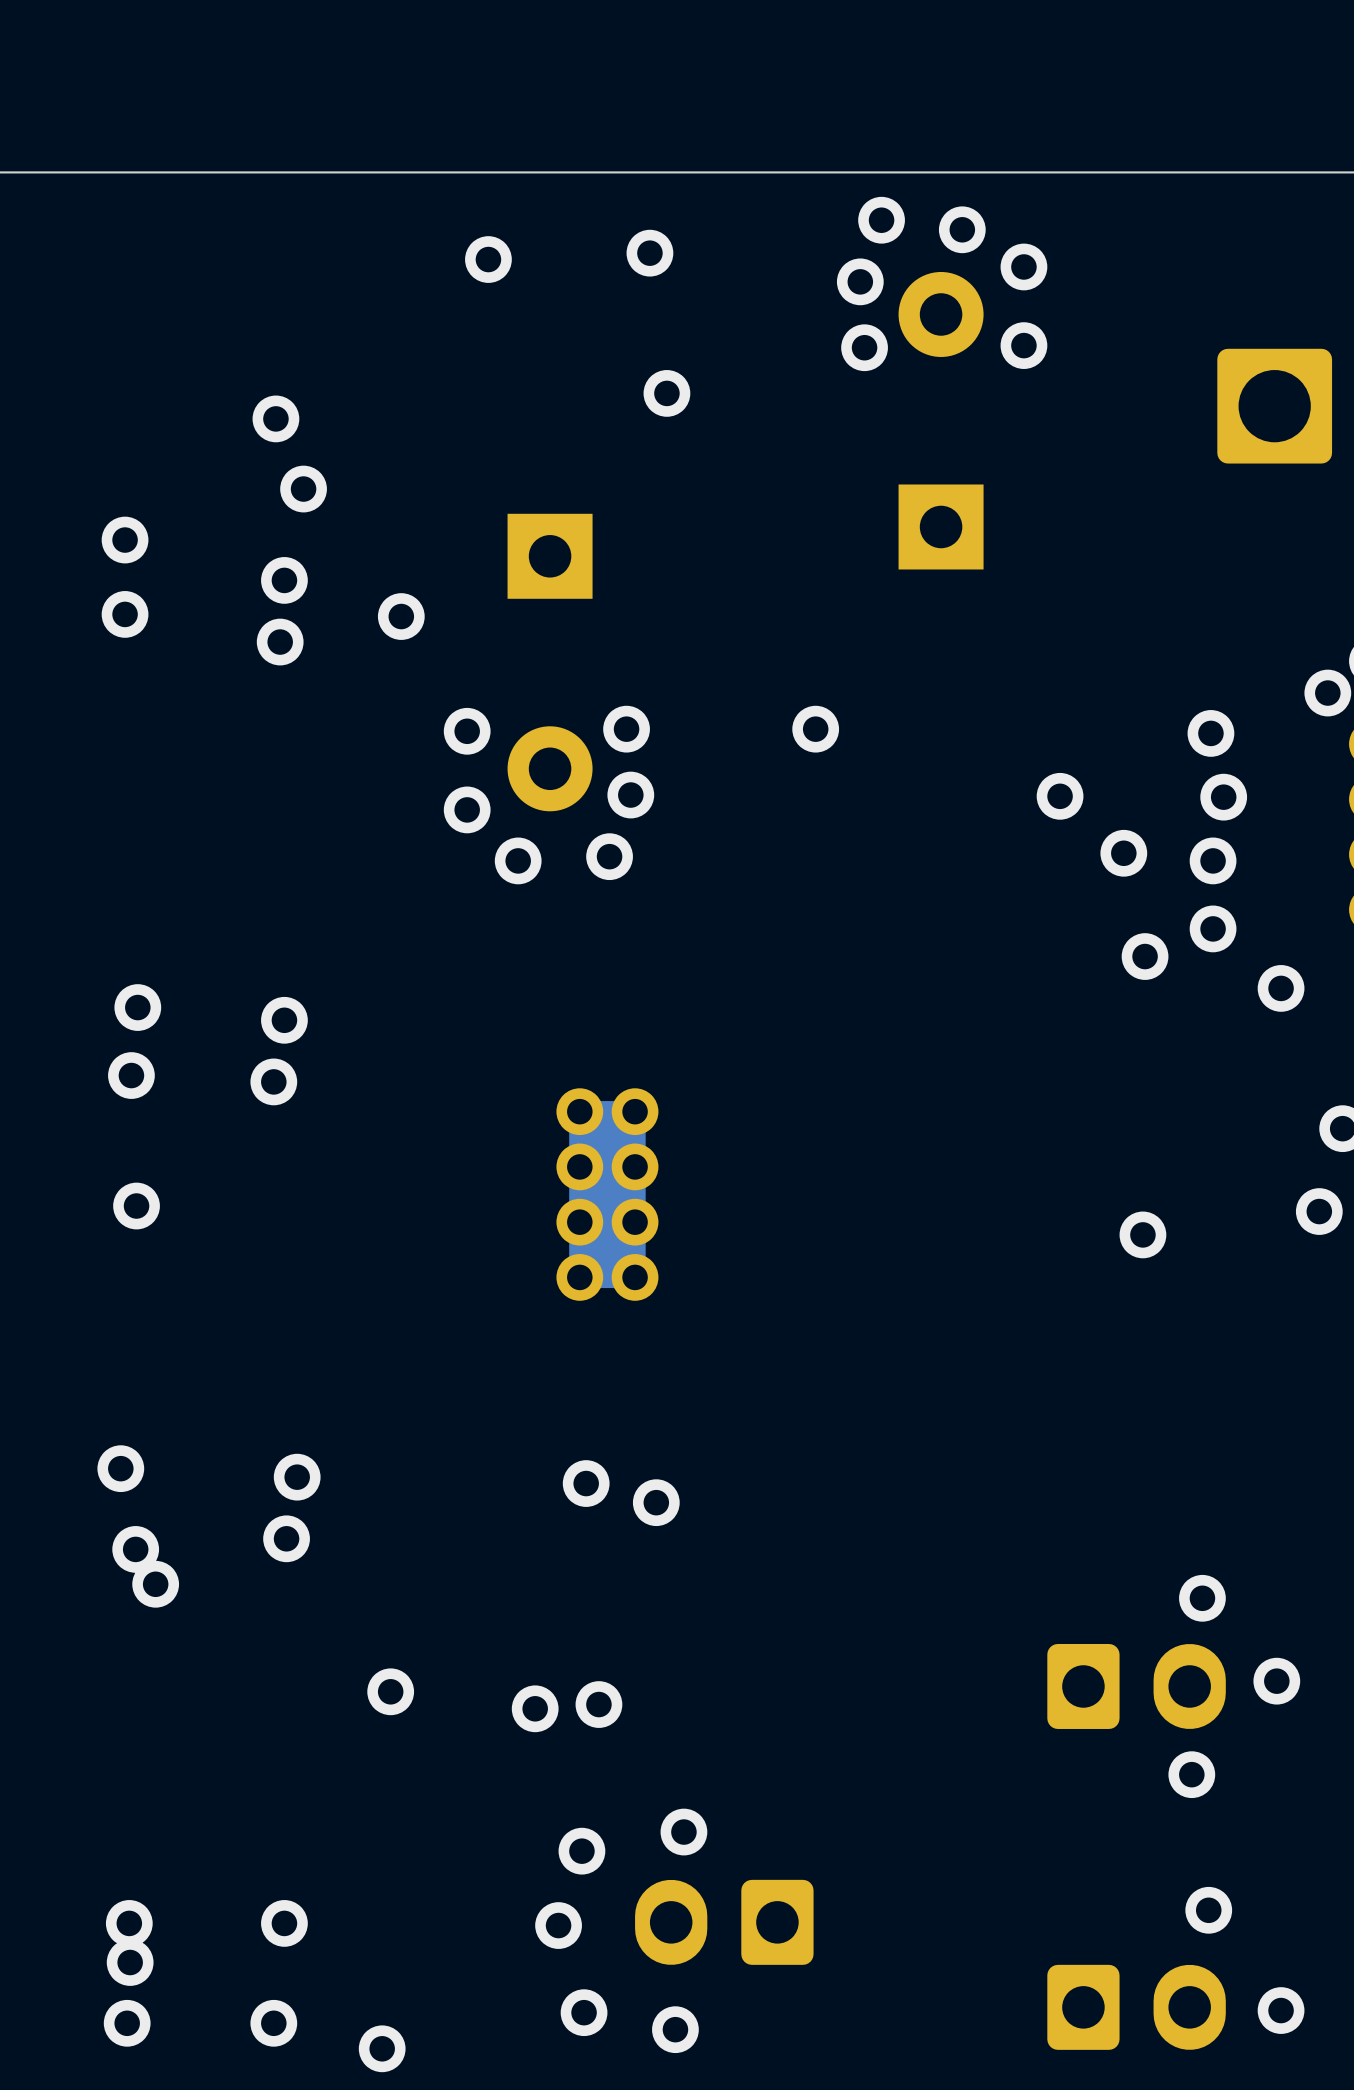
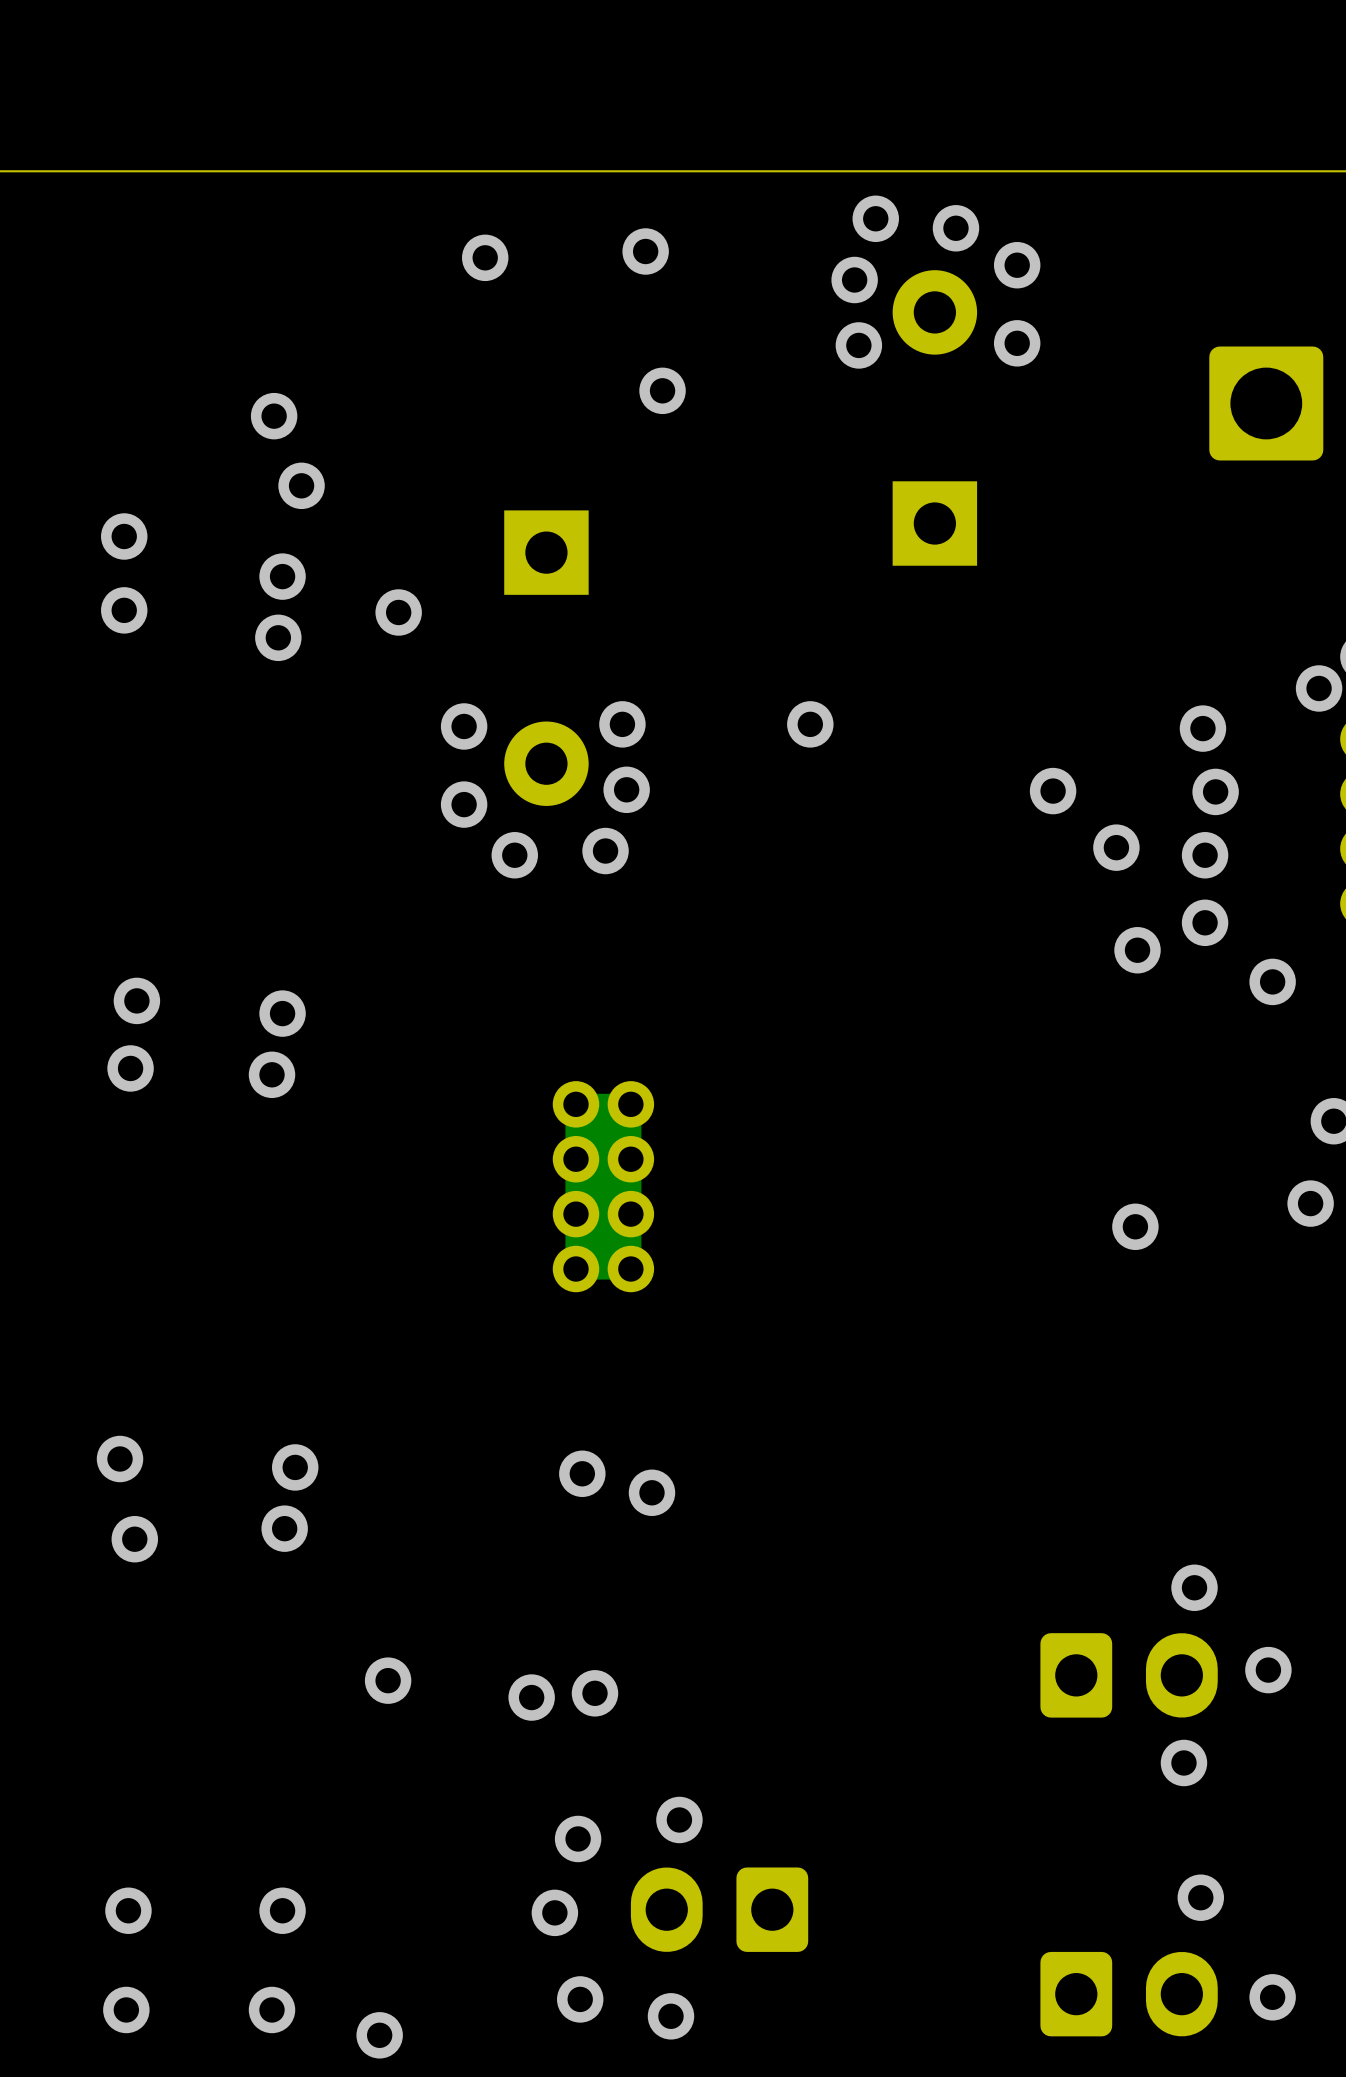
via: (136, 1206) -> none
via: (155, 1584) -> none
via: (130, 1962) -> none

